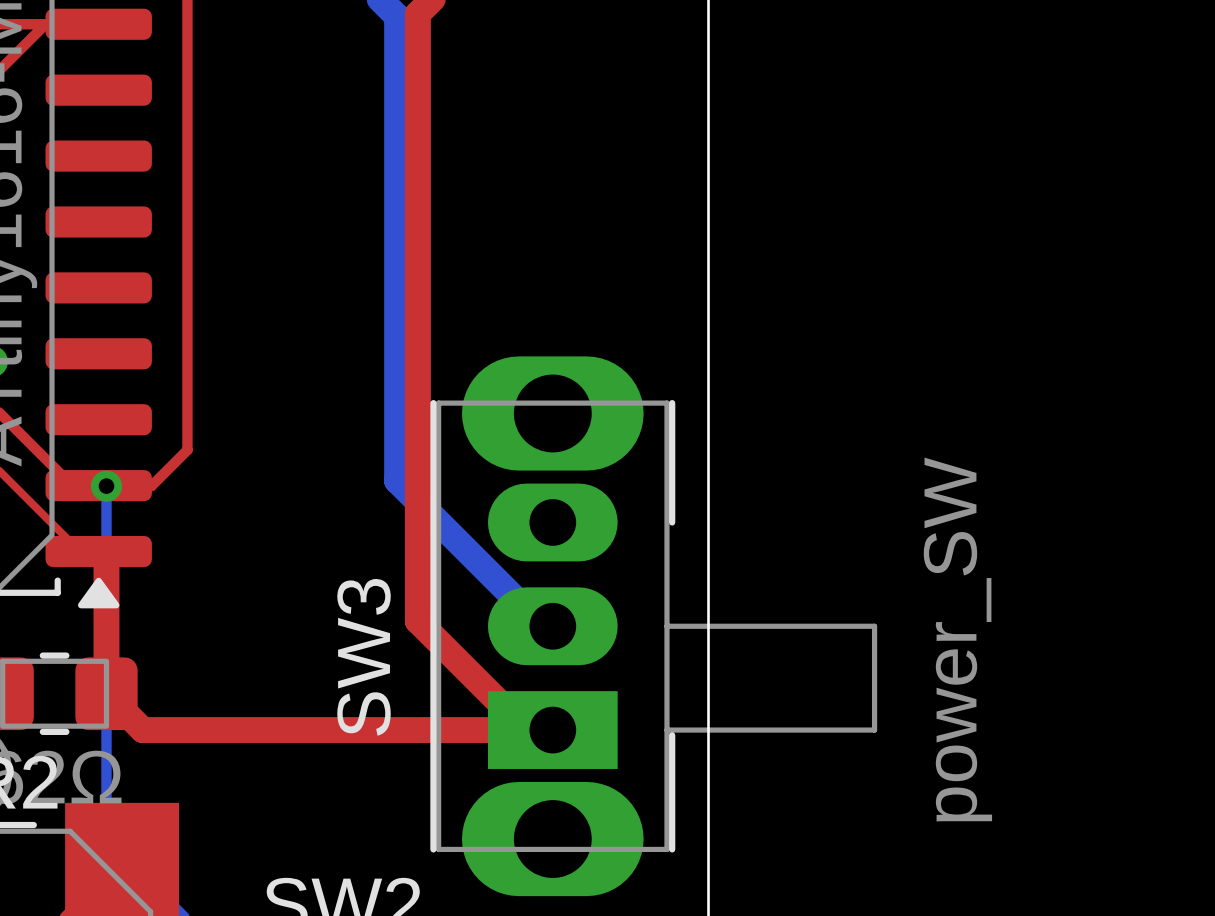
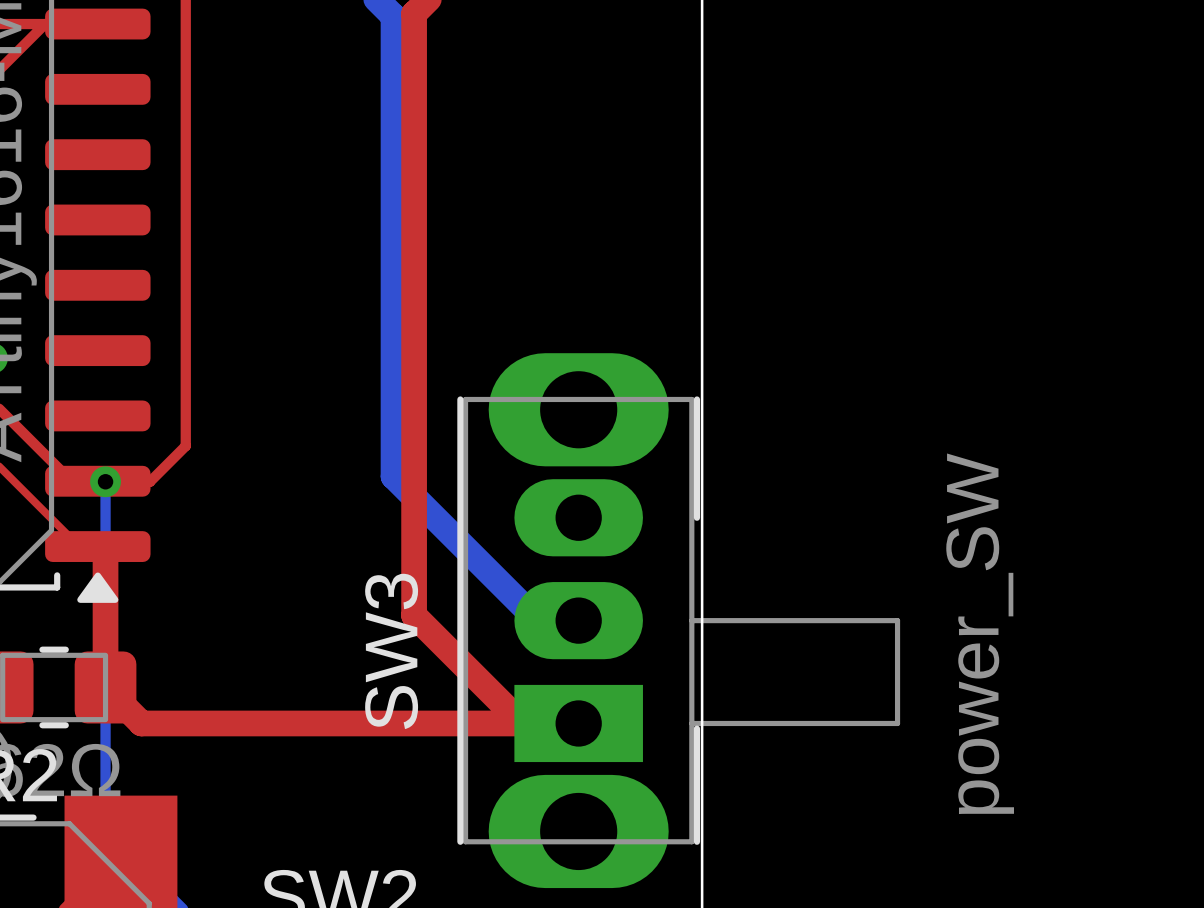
SW3 position: (653, 626) -> (678, 620)

